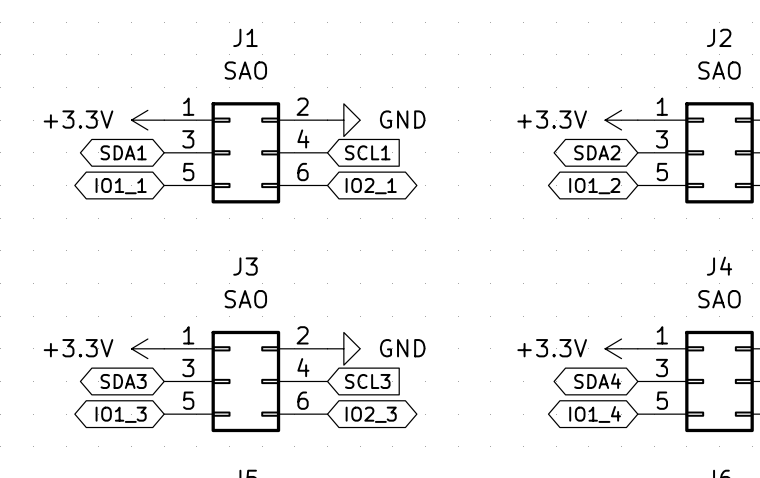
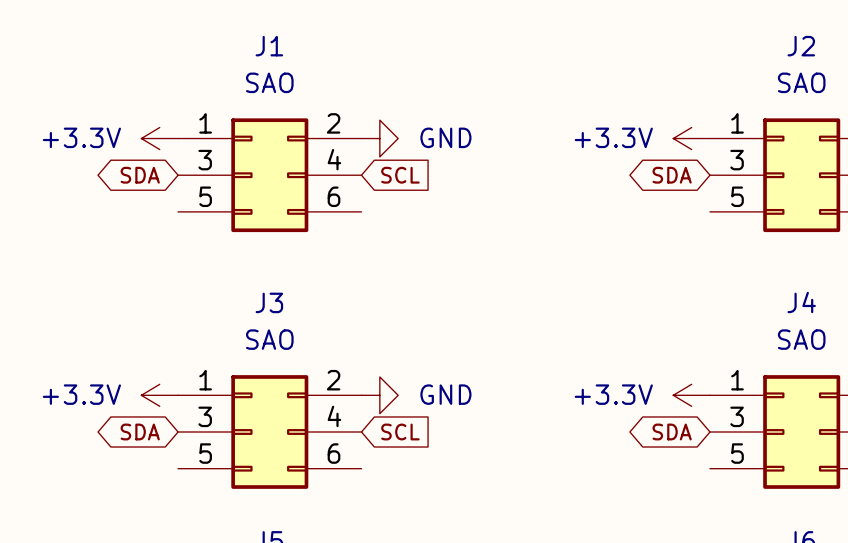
global label: SDA1 (123, 152) -> SDA (140, 175)
global label: SCL1 (367, 152) -> SCL (400, 175)
global label: SDA2 (597, 152) -> SDA (672, 175)
global label: IO1_1 (121, 186) -> none
global label: IO2_1 (371, 186) -> none
global label: IO1_2 (594, 186) -> none
global label: SDA3 (123, 381) -> SDA (140, 432)
global label: SCL3 (367, 381) -> SCL (400, 432)
global label: SDA4 (597, 381) -> SDA (672, 432)
global label: IO1_3 (121, 414) -> none
global label: IO2_3 (371, 414) -> none
global label: IO1_4 (595, 414) -> none

